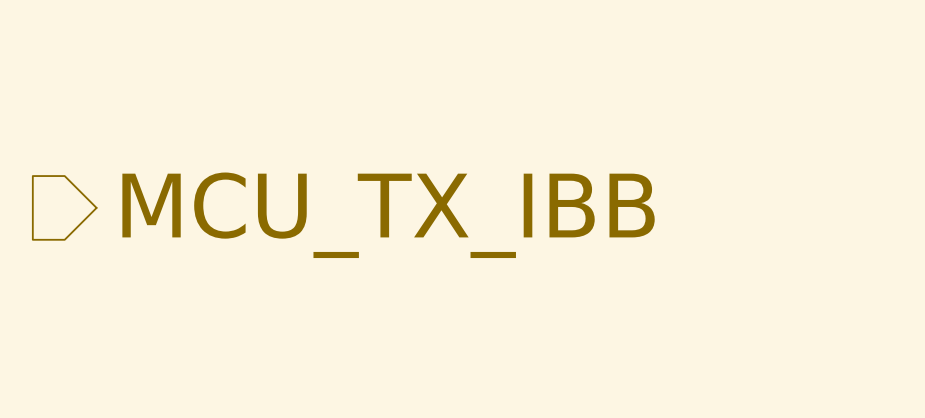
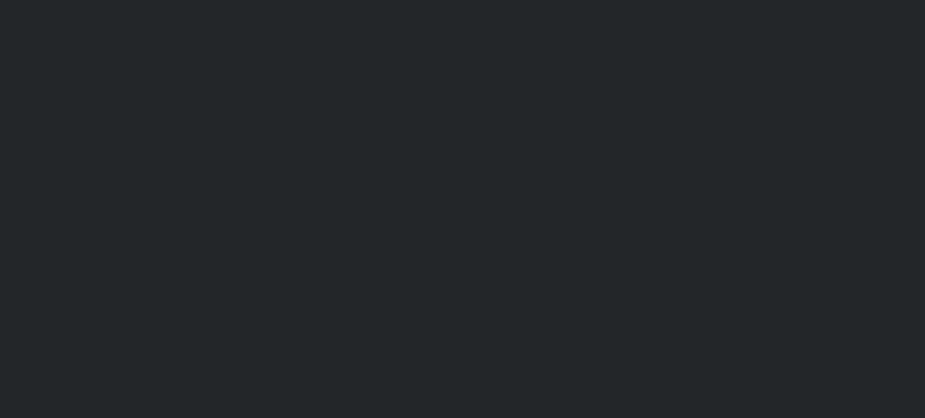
hierarchical label: MCU_TX_IBB (388, 215) -> none

